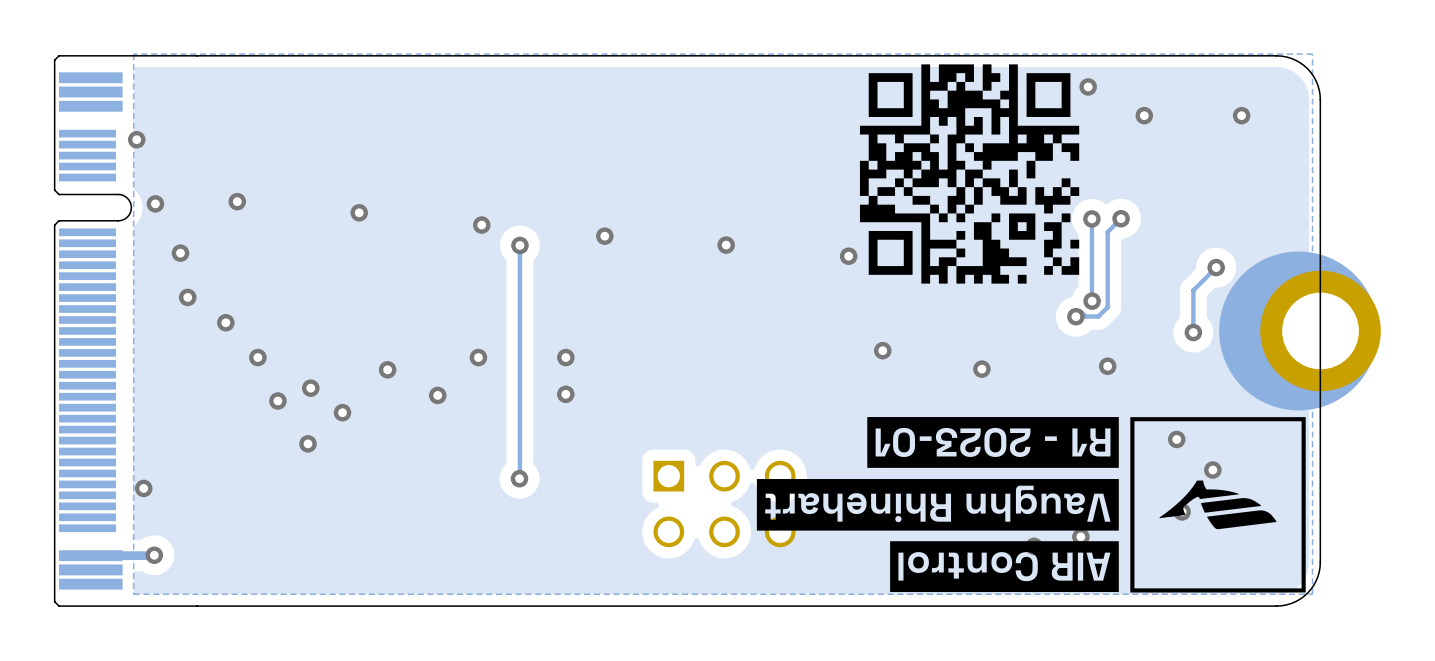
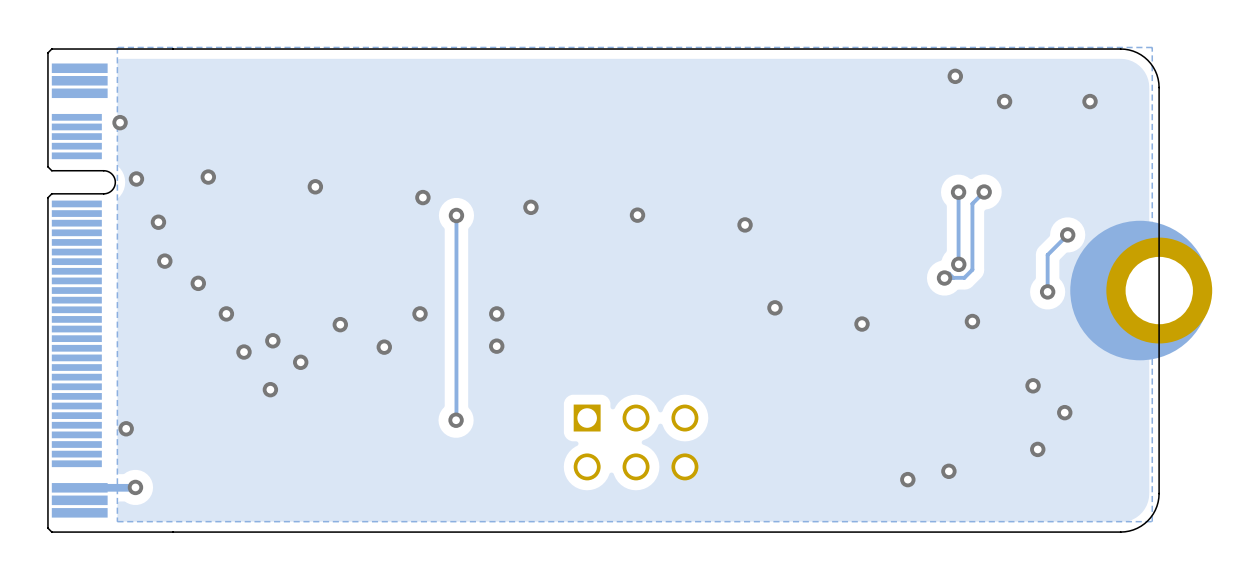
drawing: [859, 64, 1080, 284] -> none
drawing: [756, 417, 1306, 593] -> none

